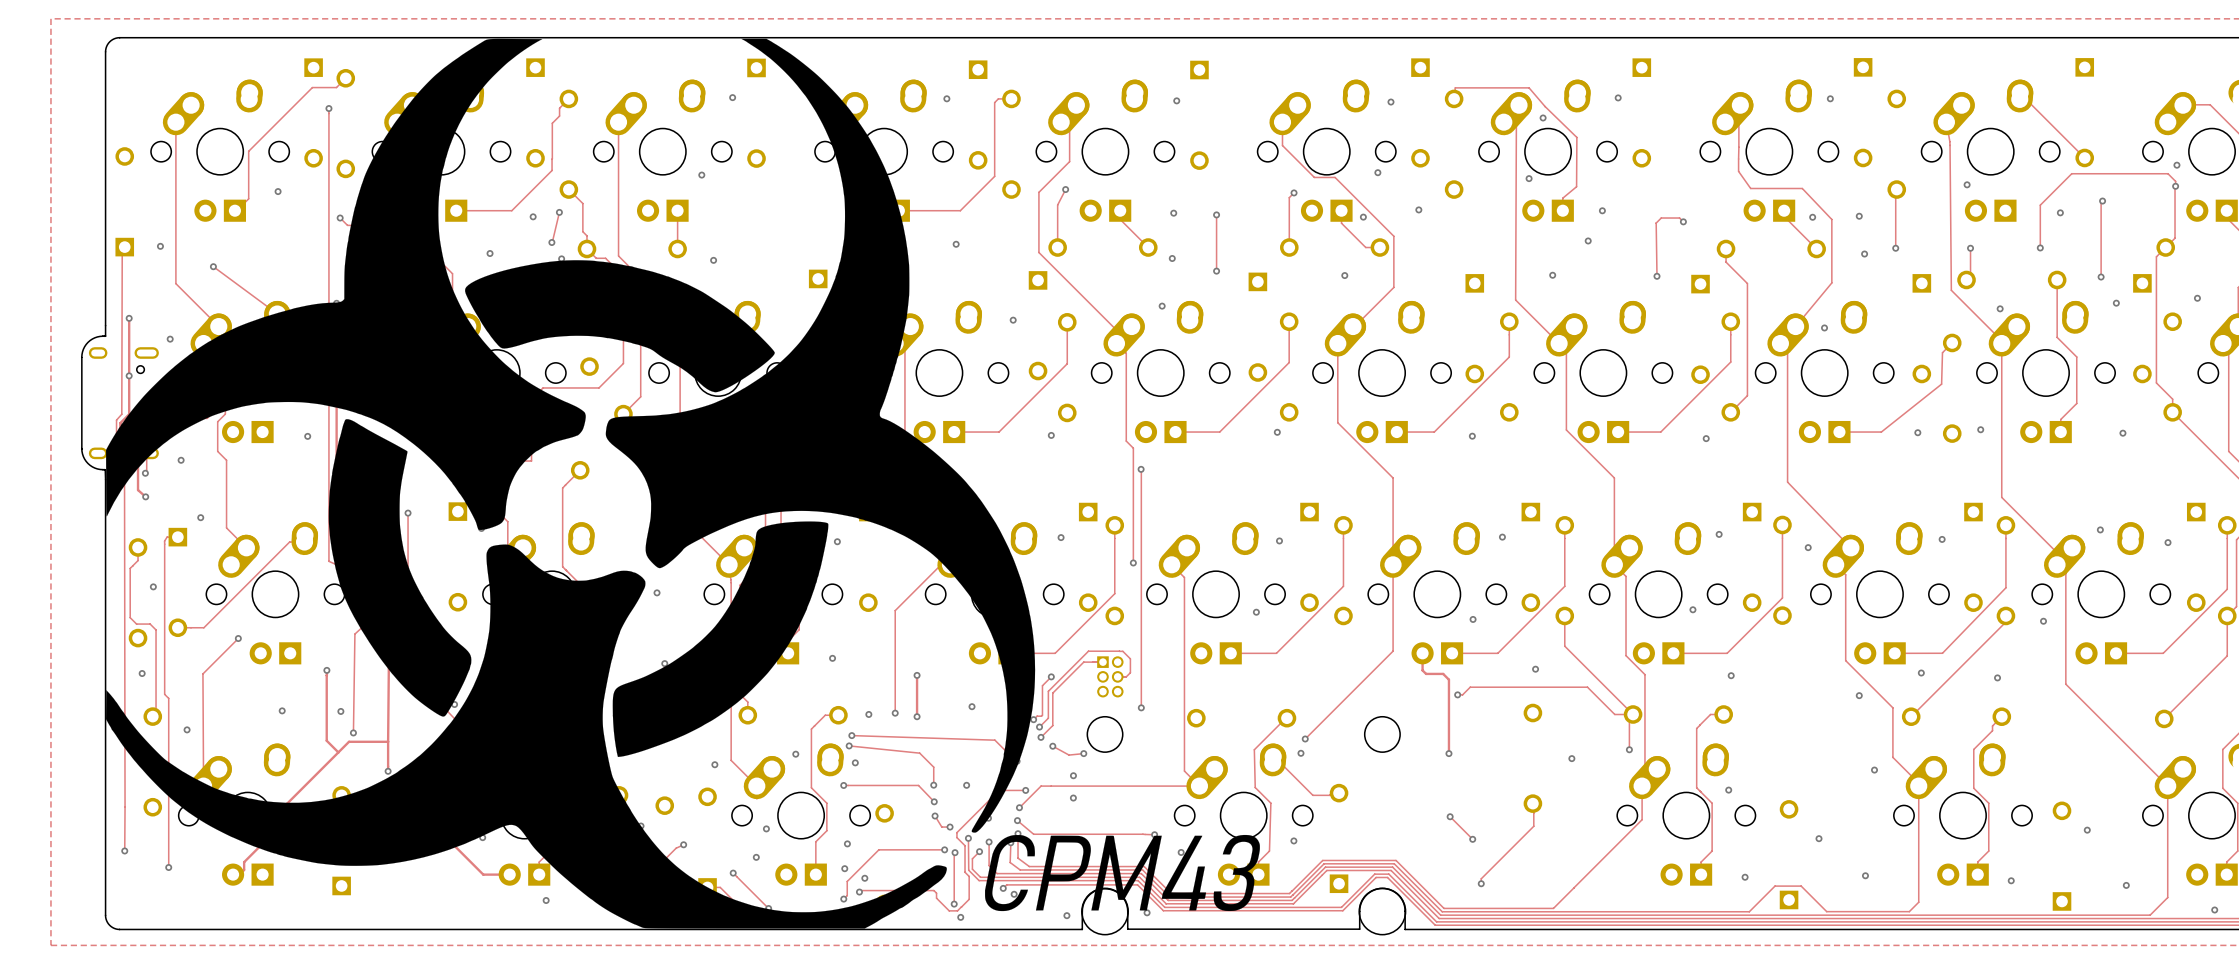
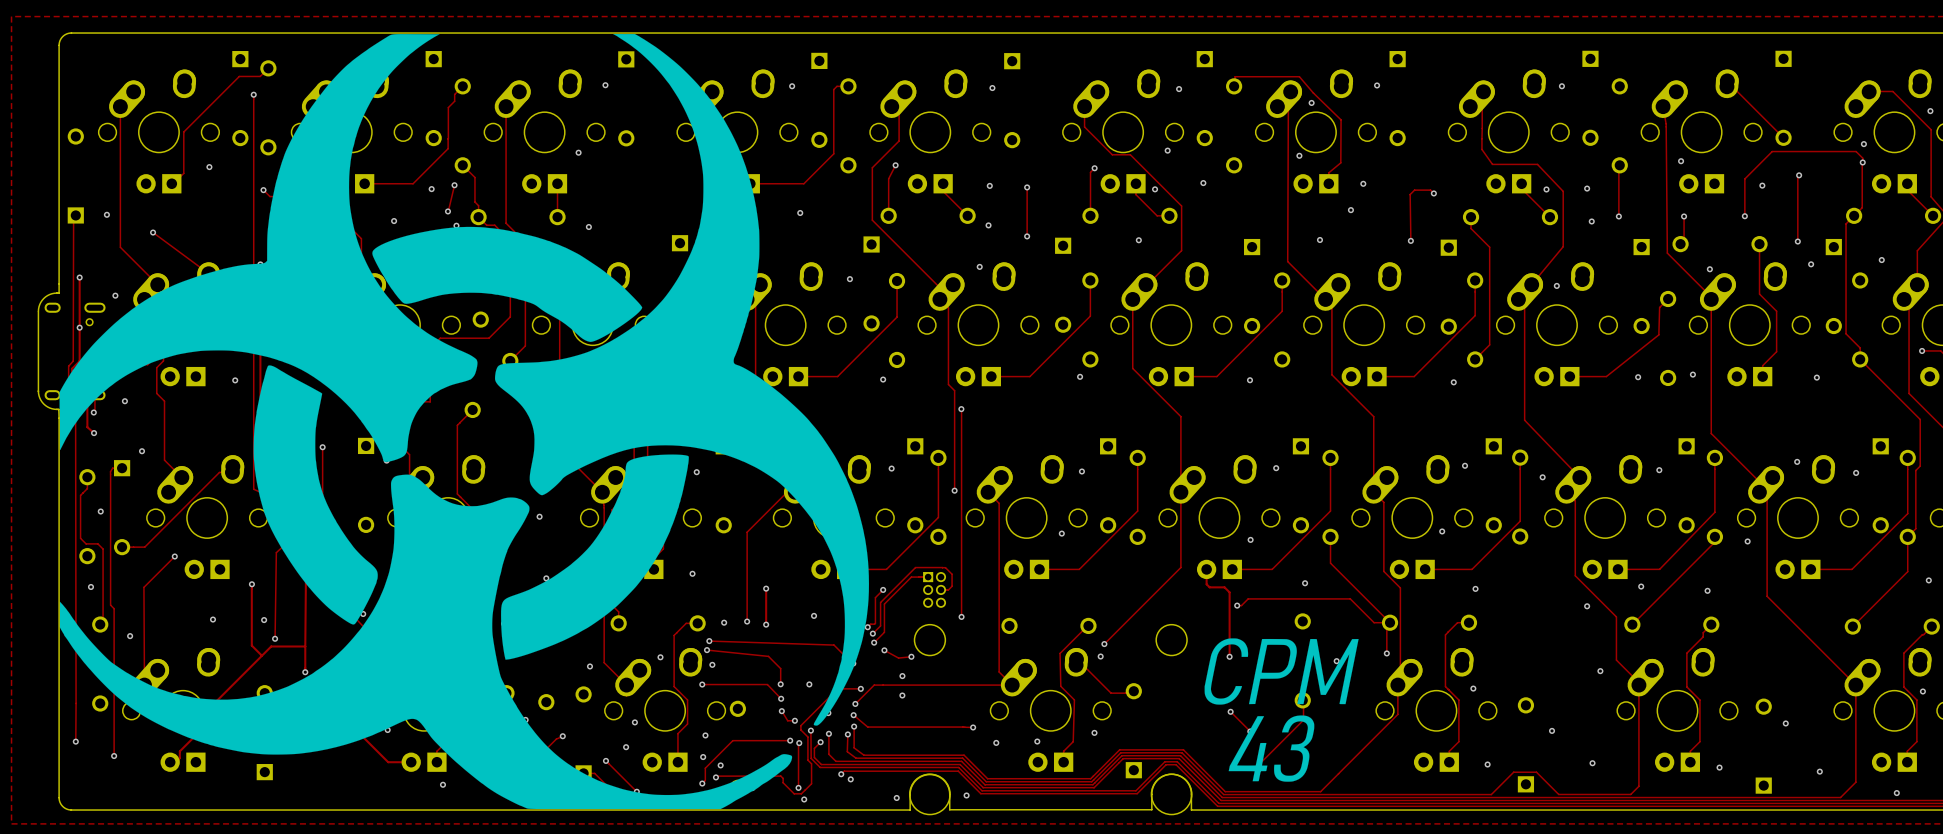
drawing: none -> [1204, 638, 1359, 782]
drawing: [985, 834, 1260, 912] -> none

